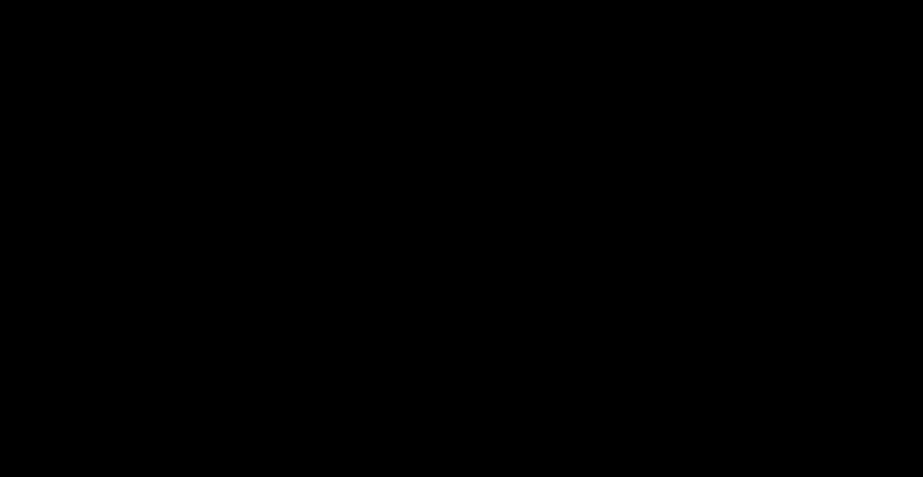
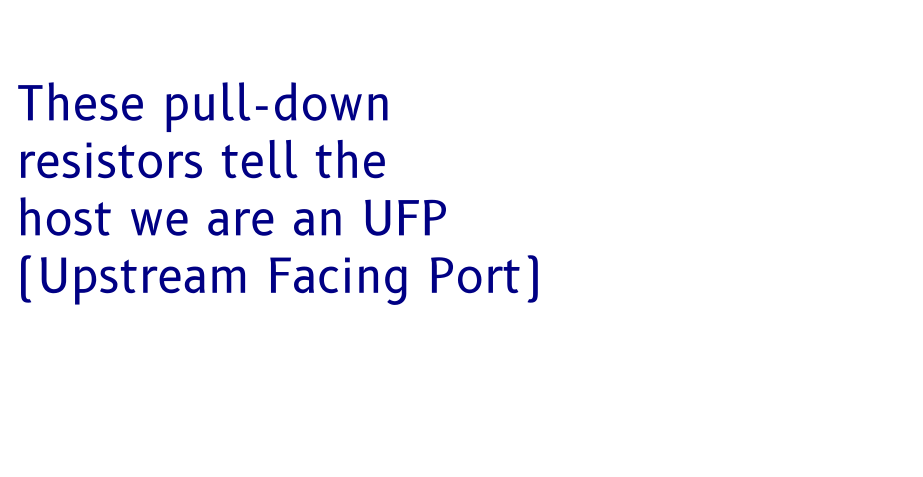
text: none -> These pull-down (202, 107)
text: none -> resistors tell the (202, 159)
text: none -> host we are an UFP (233, 216)
text: none -> (Upstream Facing Port) (279, 280)

